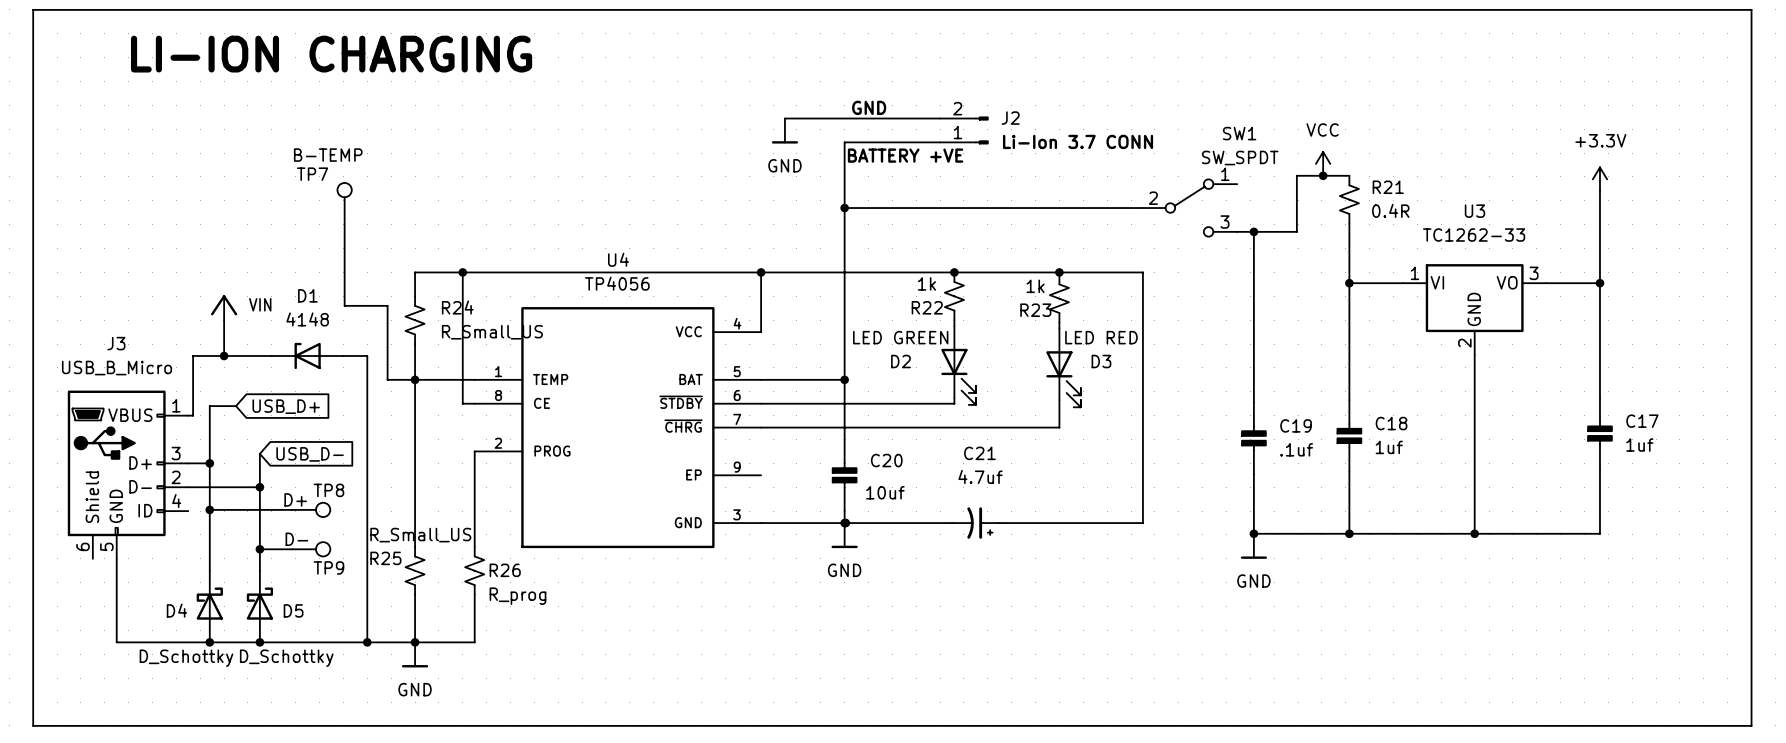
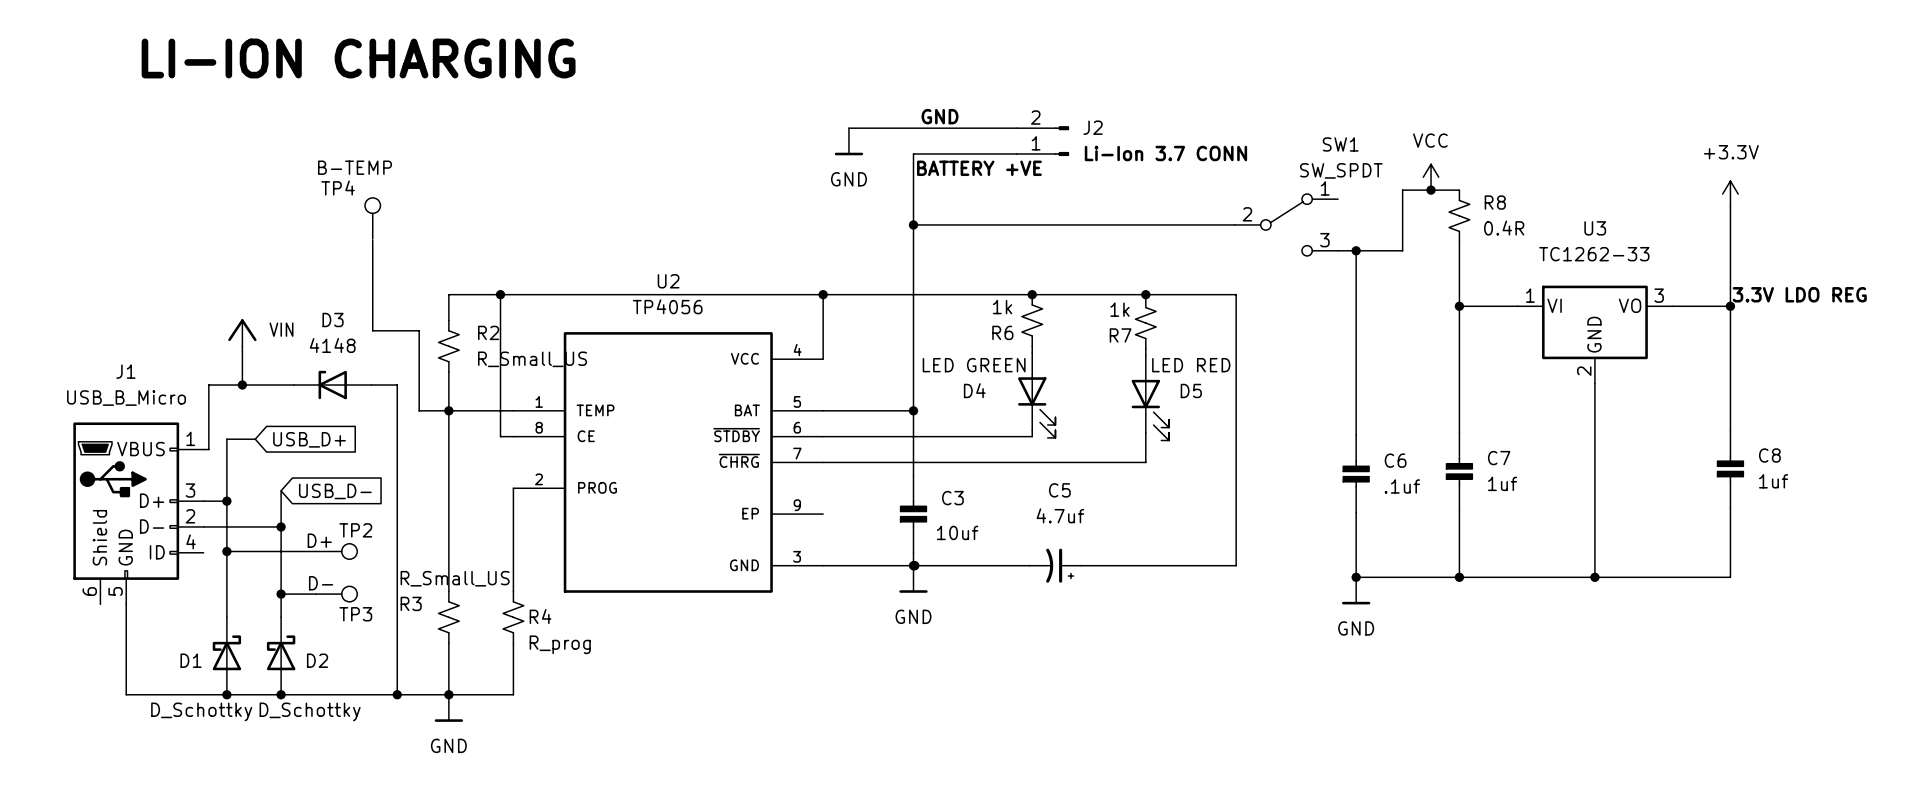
line: (33, 9) (33, 725) (1751, 725) (1751, 9) (33, 9) -> none
TP7 name: TP7 (312, 174) -> TP4 (338, 188)
R21 name: R21 (1388, 187) -> R8 (1495, 202)
U4 name: U4 (618, 259) -> U2 (668, 281)
label: none -> 3.3V LDO REG (1799, 294)
D1 name: D1 (307, 295) -> D3 (333, 320)
R24 name: R24 (457, 307) -> R2 (488, 332)
R22 name: R22 (927, 307) -> R6 (1002, 332)
R23 name: R23 (1035, 310) -> R7 (1120, 335)
J3 name: J3 (116, 343) -> J1 (125, 371)
D2 name: D2 (900, 361) -> D4 (974, 390)
D3 name: D3 (1101, 361) -> D5 (1191, 390)
C17 name: C17 (1642, 421) -> C8 (1769, 455)
C18 name: C18 (1391, 423) -> C7 (1499, 458)
C19 name: C19 (1296, 425) -> C6 (1395, 460)
C21 name: C21 (979, 453) -> C5 (1059, 490)
C20 name: C20 (886, 460) -> C3 (952, 498)
TP8 name: TP8 (328, 490) -> TP2 (355, 530)
R25 name: R25 (385, 558) -> R3 (411, 603)
TP9 name: TP9 (328, 567) -> TP3 (355, 614)
R26 name: R26 (505, 570) -> R4 (540, 616)
D4 name: D4 (176, 610) -> D1 (191, 660)
D5 name: D5 (293, 610) -> D2 (317, 660)

